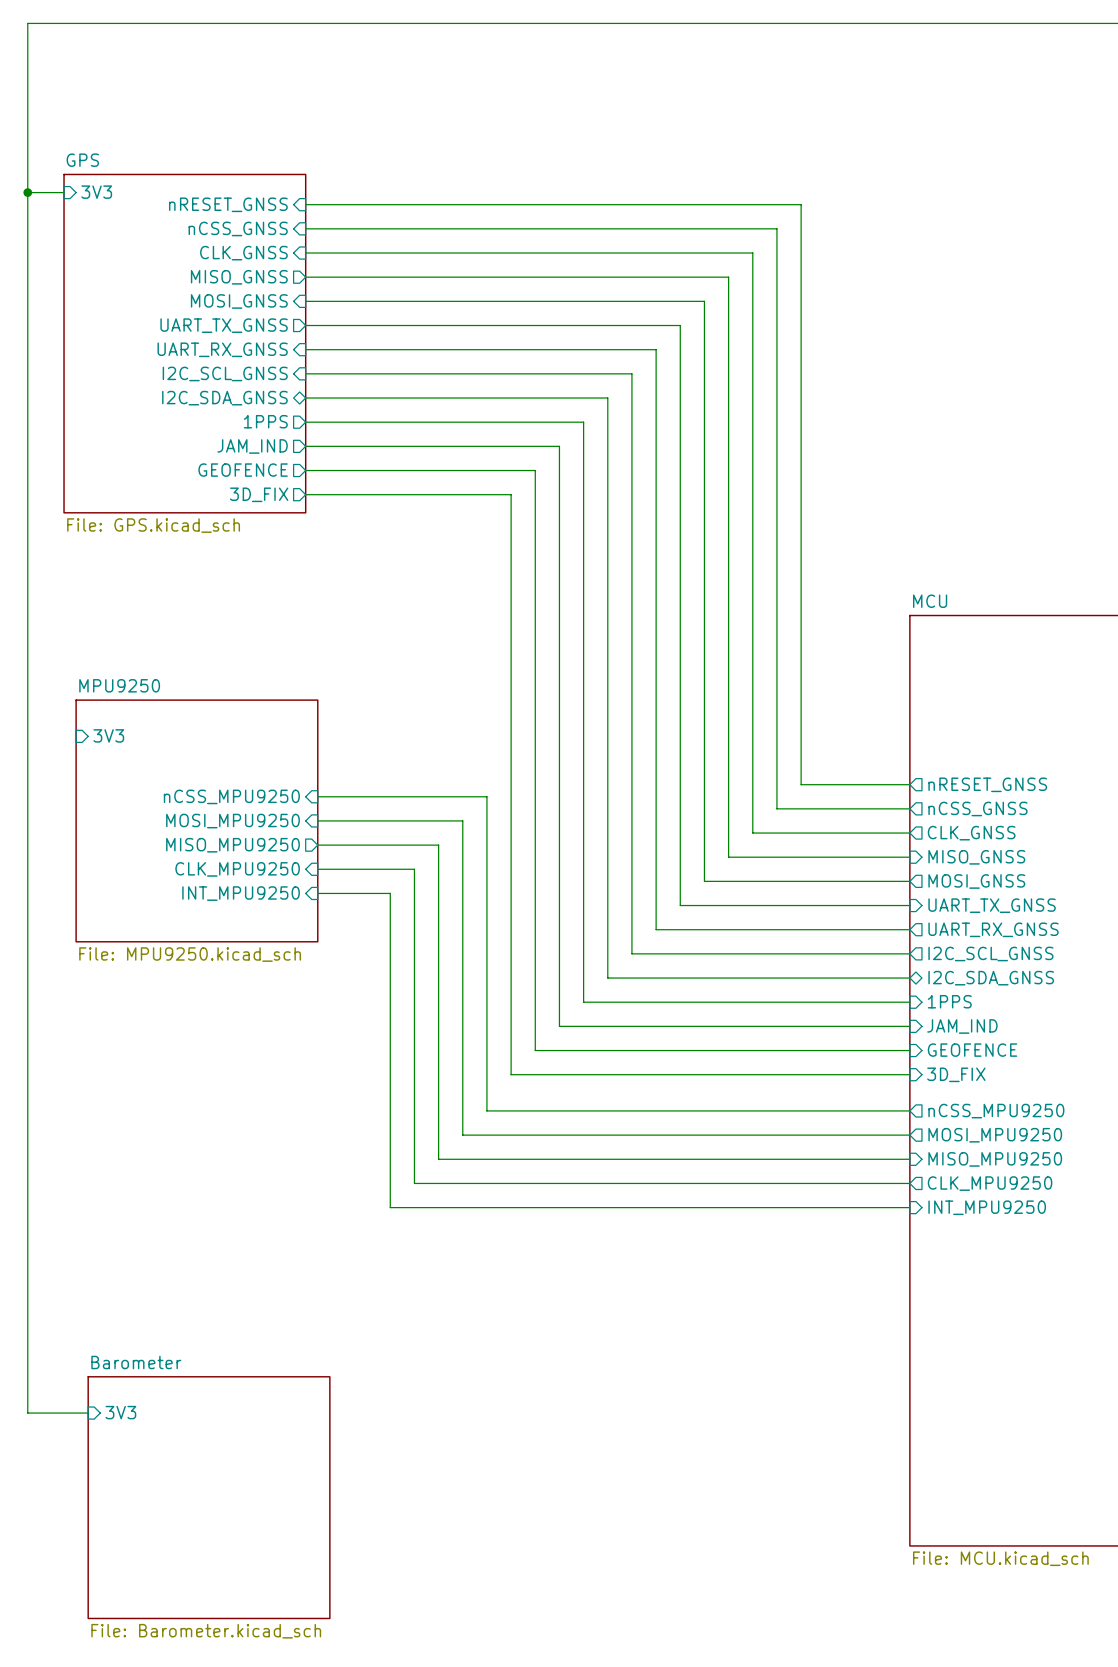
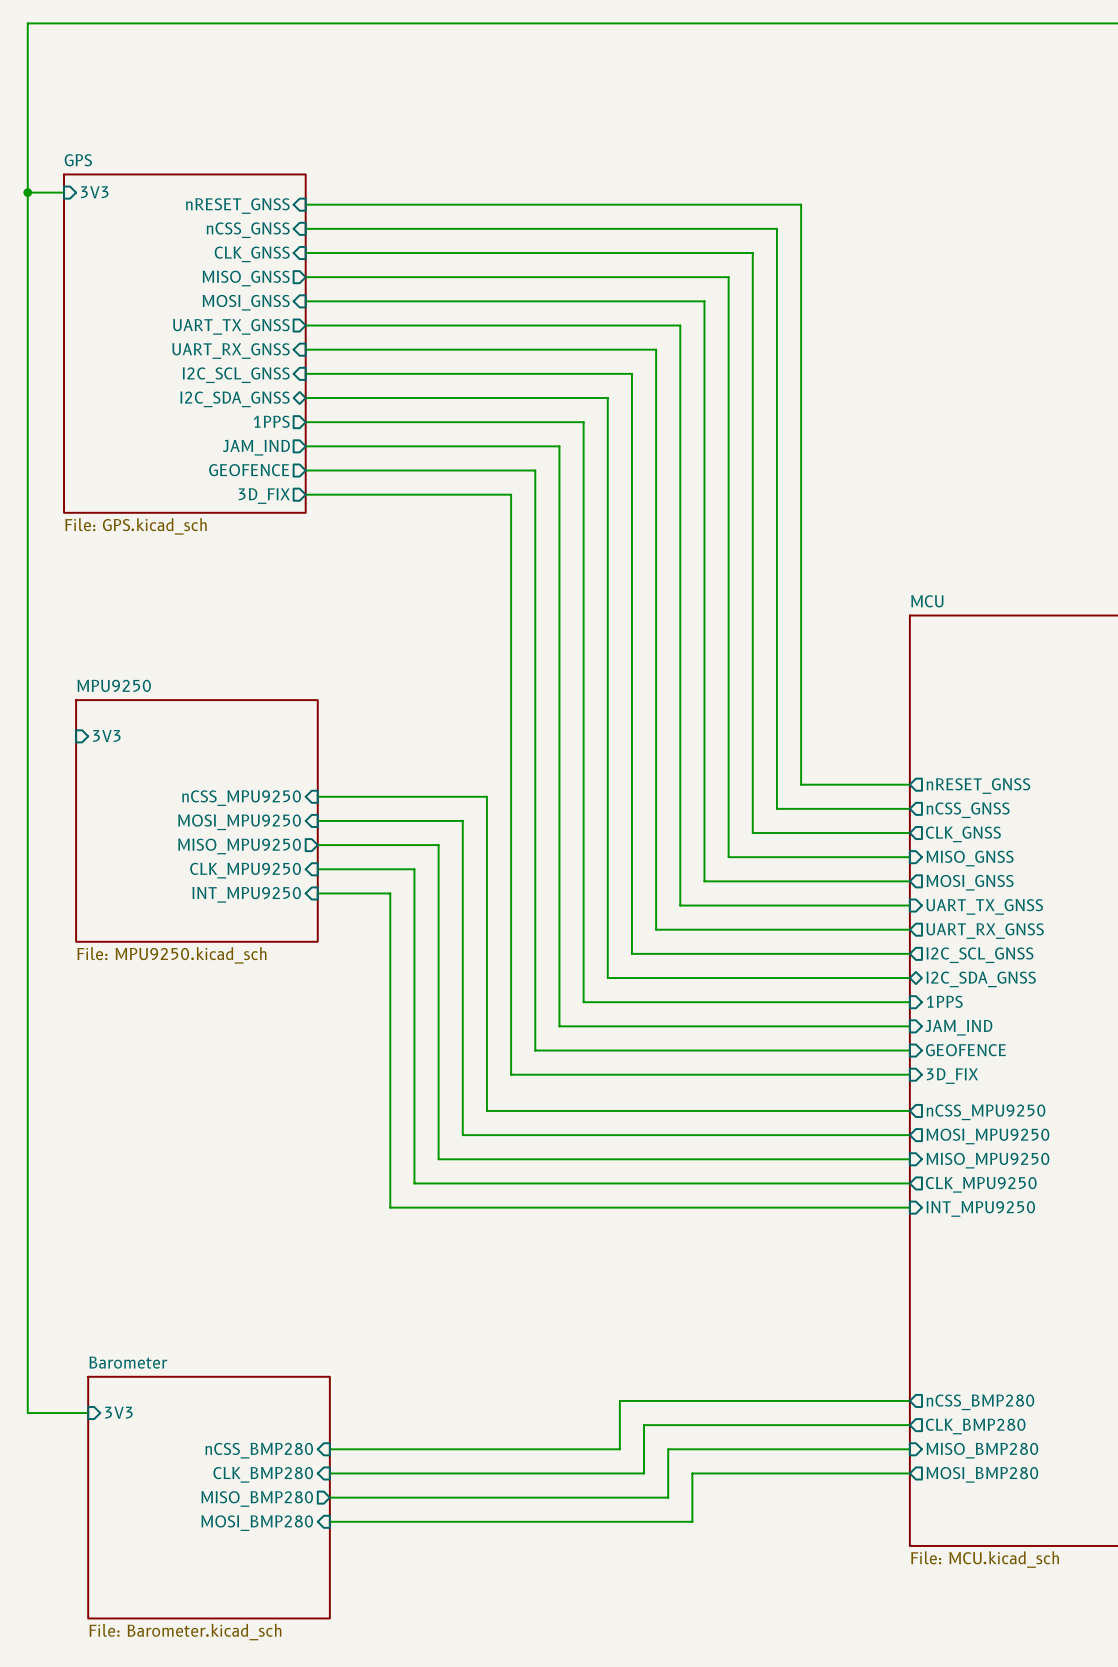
wire: none -> (909, 1400) (619, 1400) (619, 1449) (329, 1449)
sheet pin: none -> nCSS_BMP280 (980, 1402)
wire: none -> (909, 1425) (644, 1425) (644, 1473) (329, 1473)
sheet pin: none -> CLK_BMP280 (975, 1426)
sheet pin: none -> nCSS_BMP280 (259, 1450)
wire: none -> (909, 1449) (668, 1449) (668, 1497) (329, 1497)
sheet pin: none -> MISO_BMP280 (982, 1450)
sheet pin: none -> CLK_BMP280 (263, 1474)
wire: none -> (909, 1473) (692, 1473) (692, 1521) (329, 1521)
sheet pin: none -> MOSI_BMP280 (982, 1474)
sheet pin: none -> MISO_BMP280 (257, 1498)
sheet pin: none -> MOSI_BMP280 (257, 1523)

